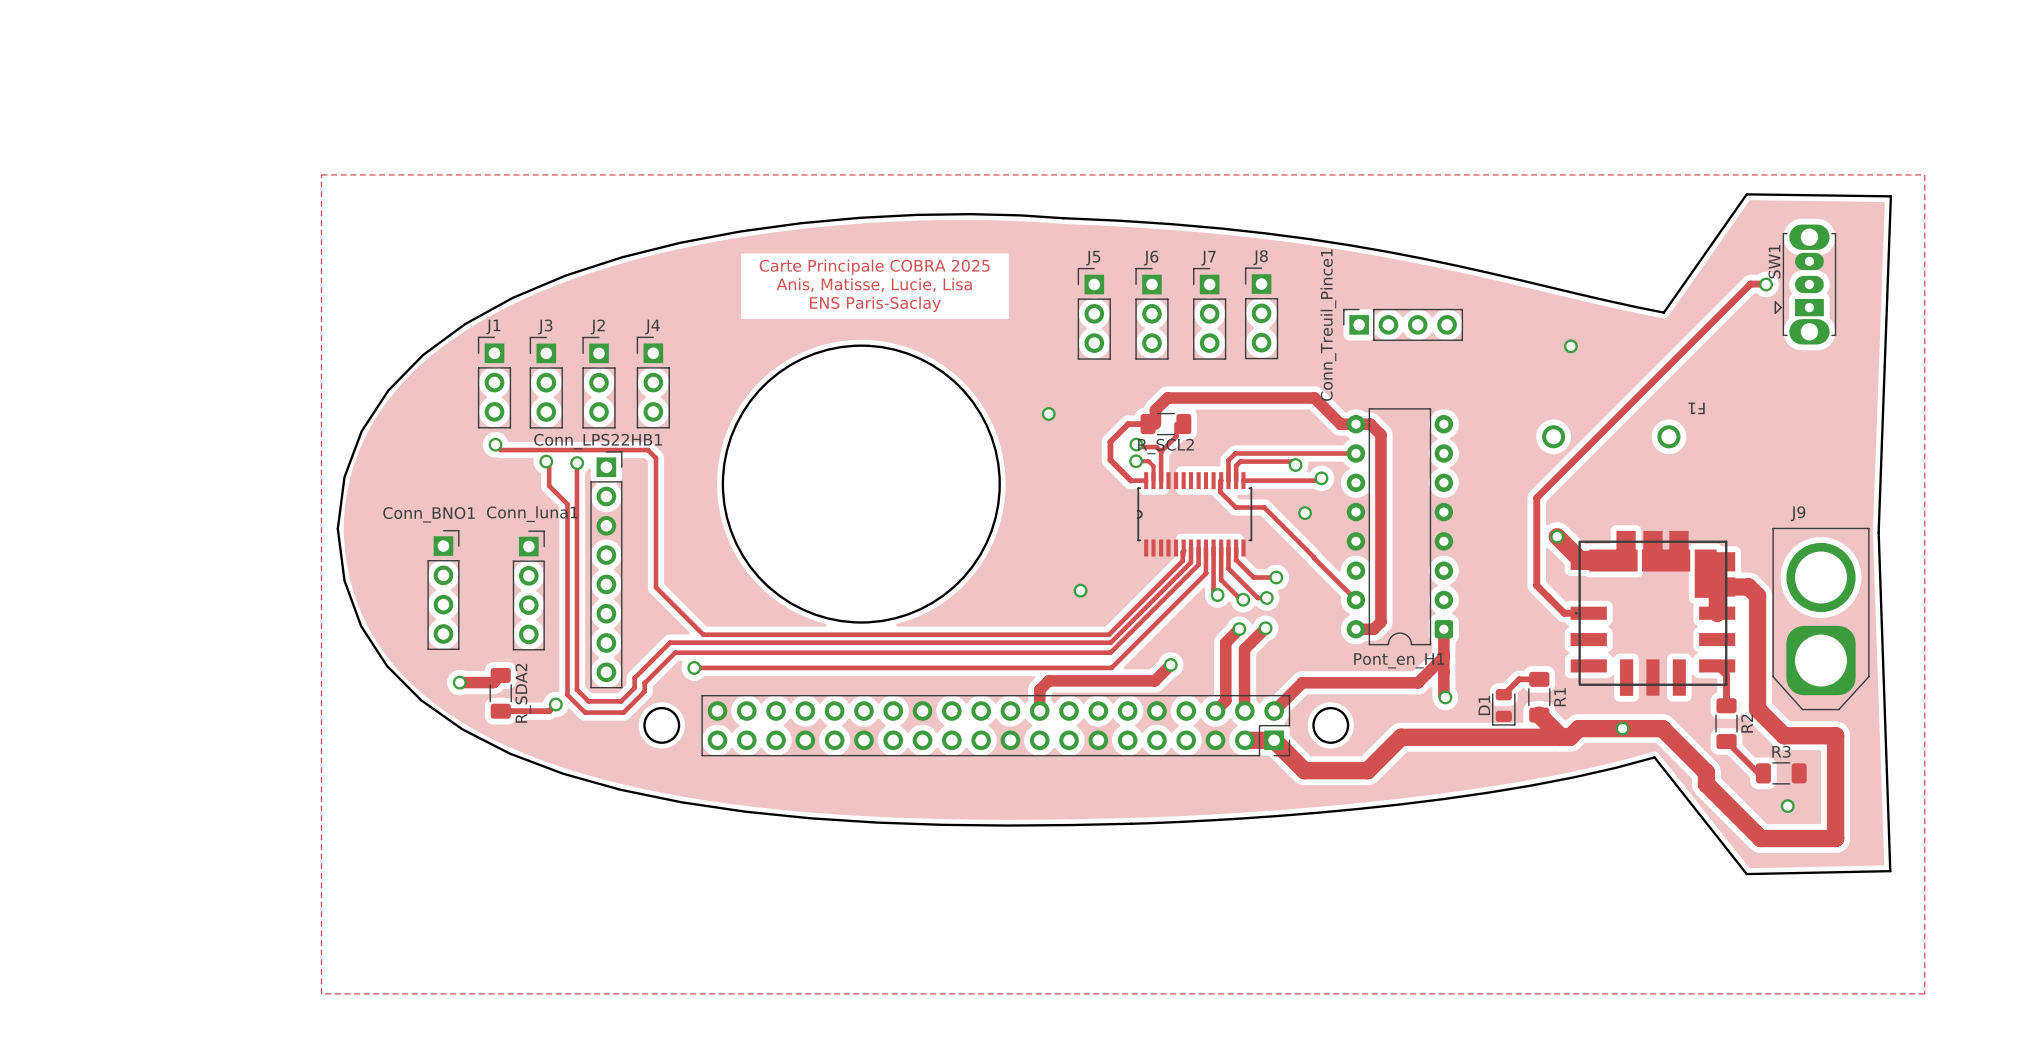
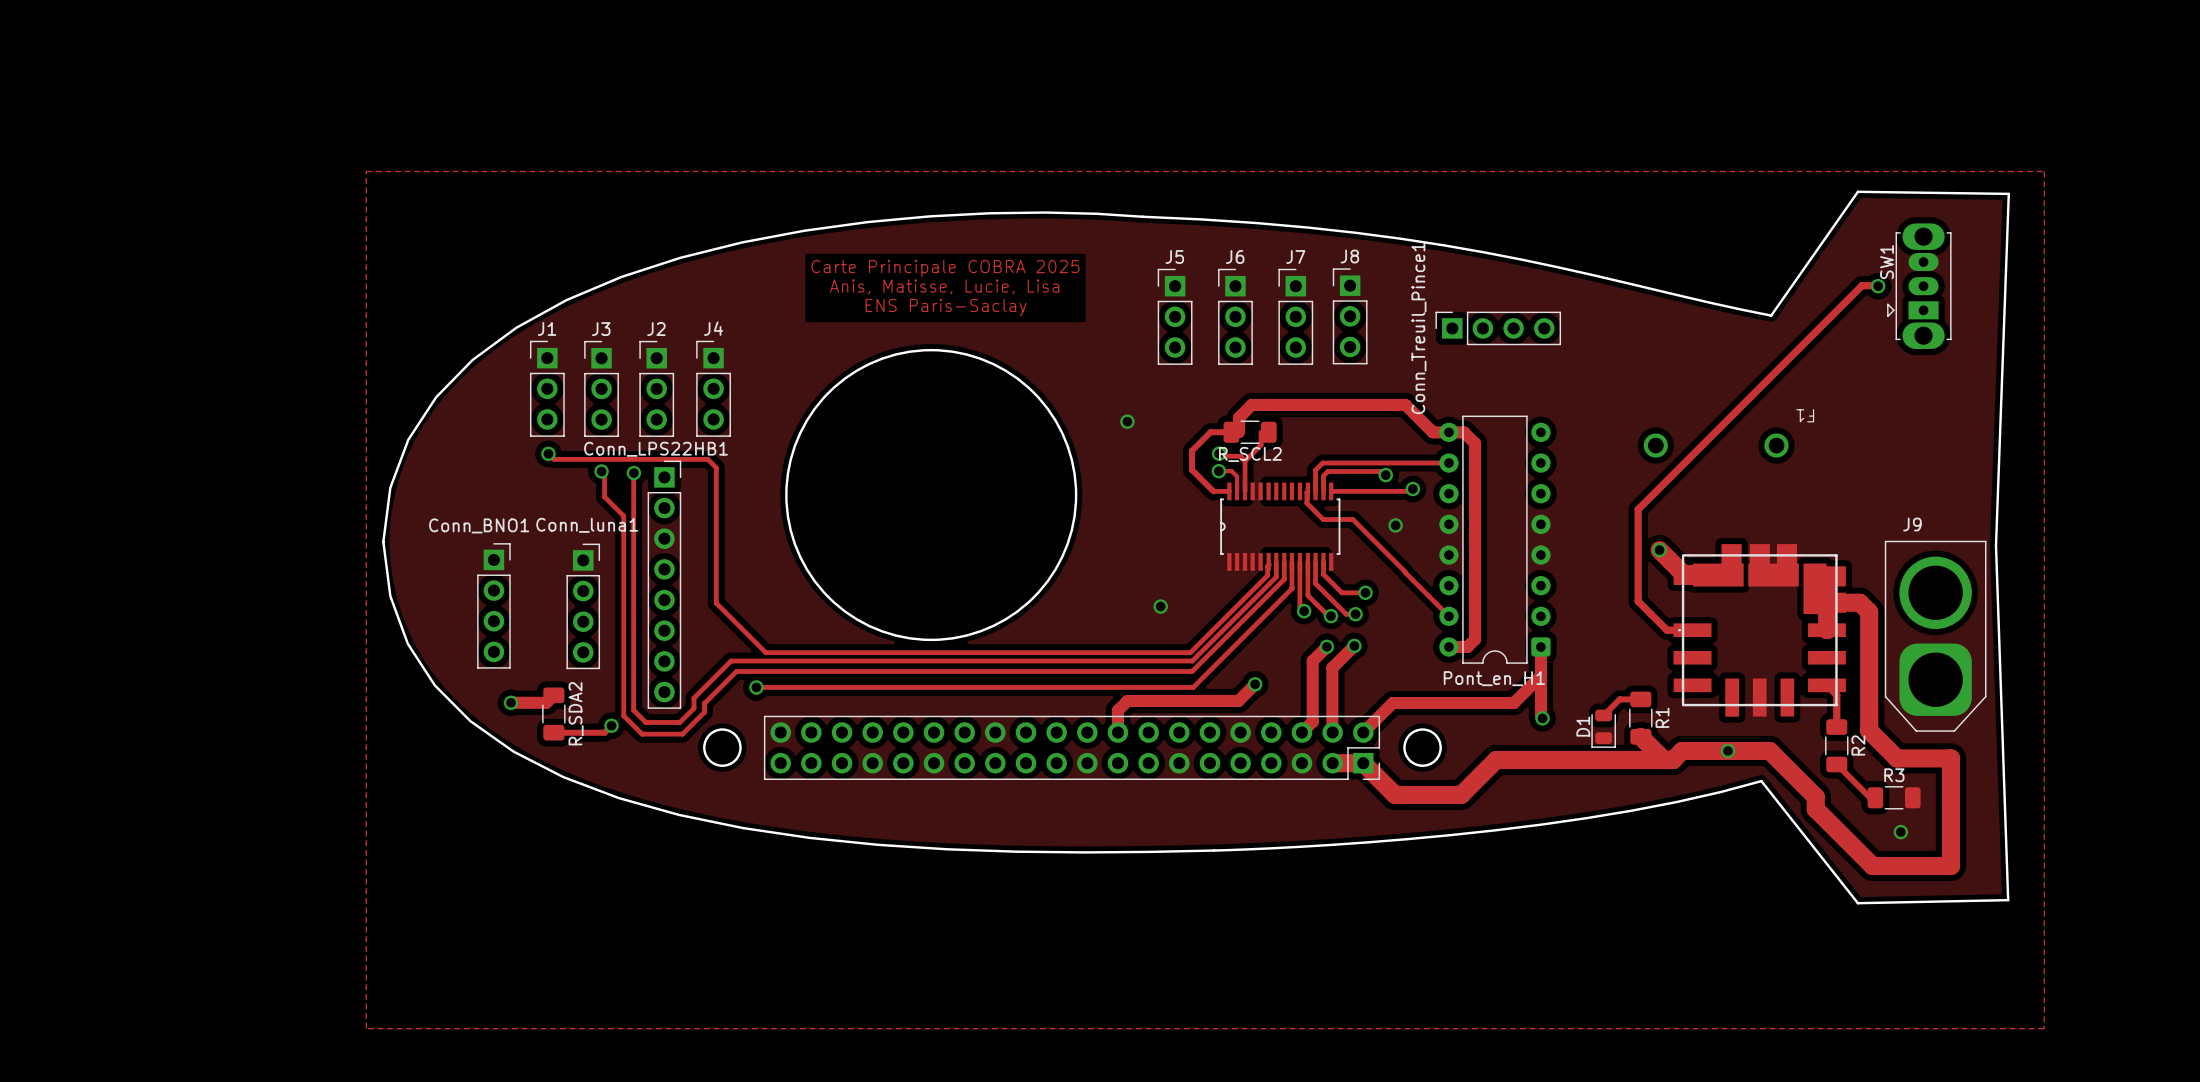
via: (1570, 346) -> none

